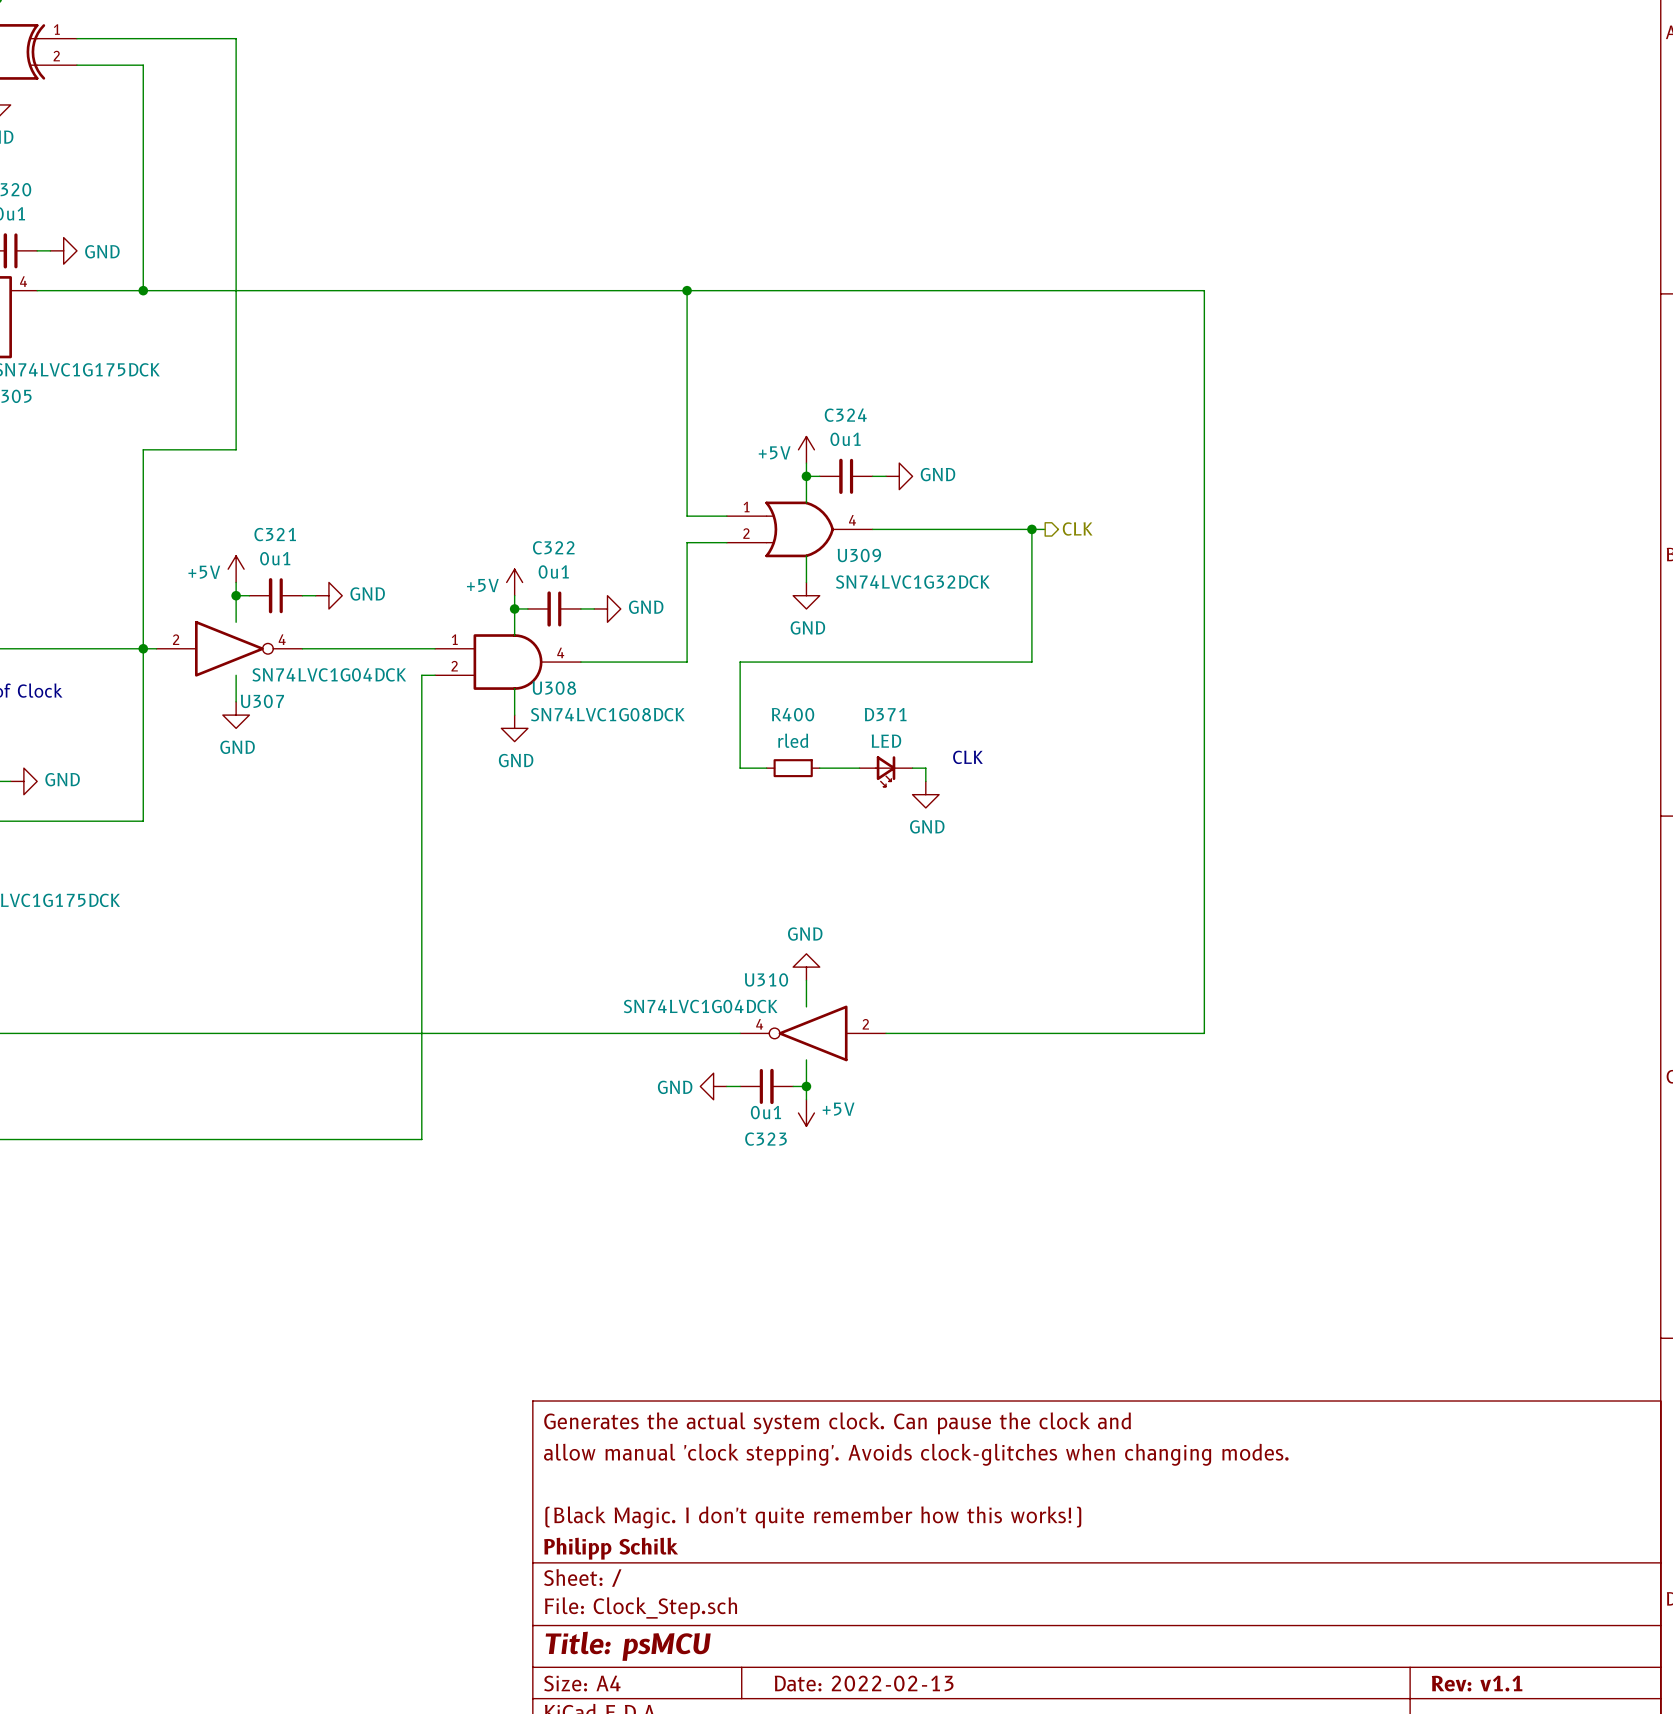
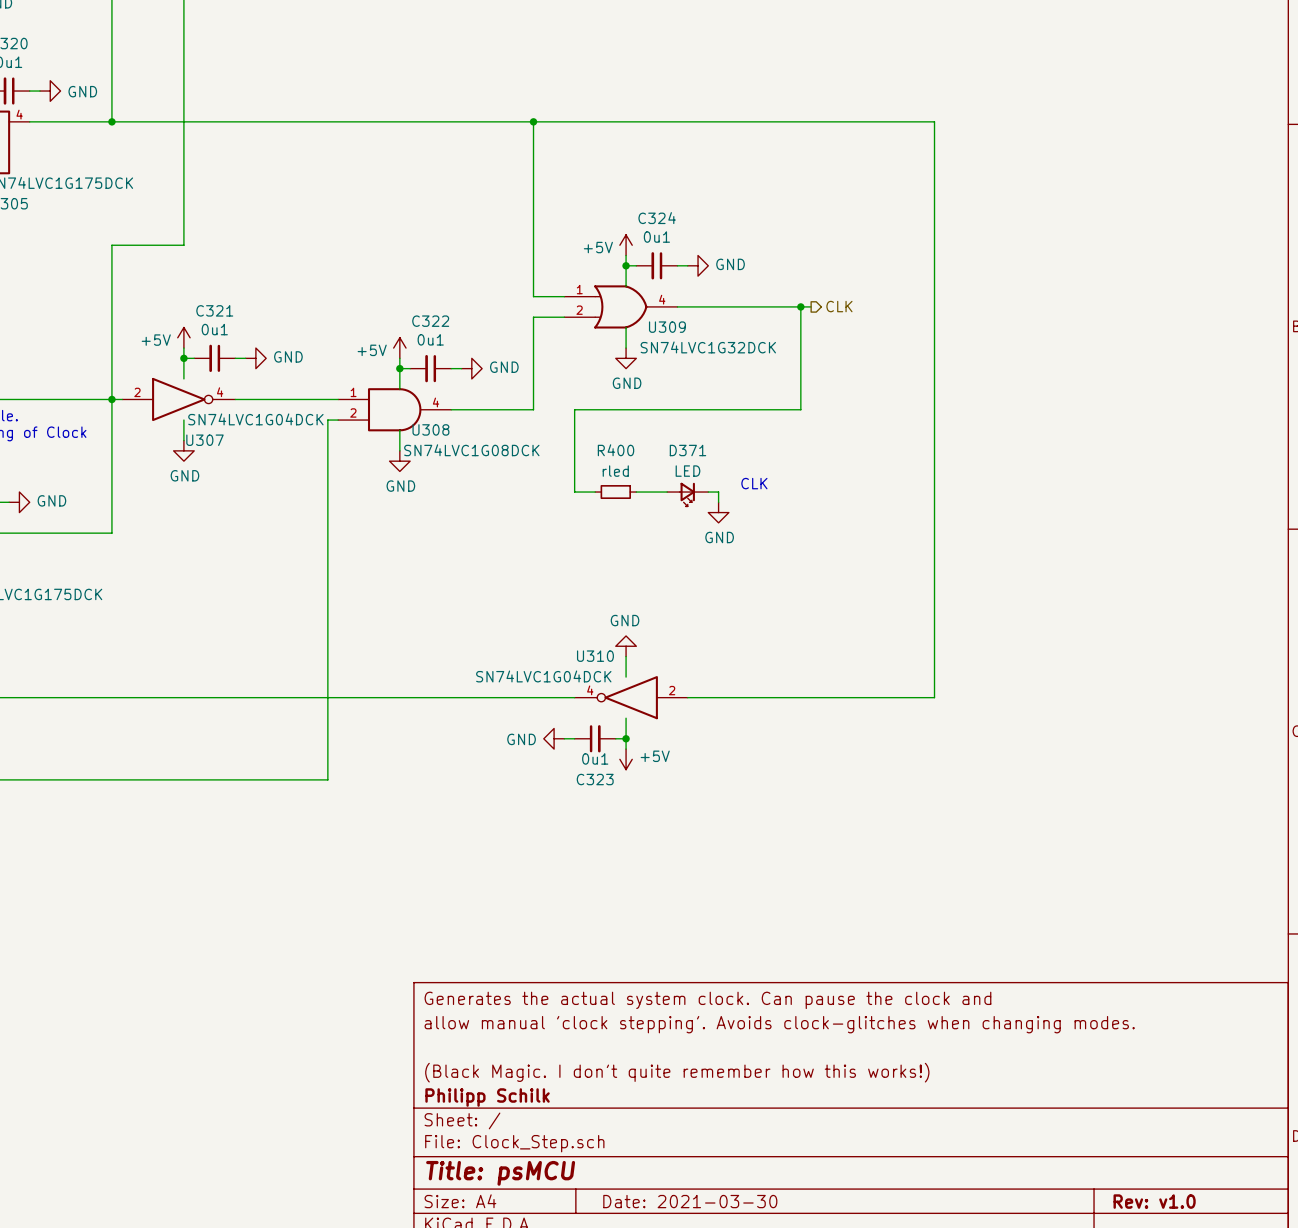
title block: Date: 2022-02-13 (864, 1683) -> Date: 2021-03-30 (690, 1201)
title block: Rev: v1.1 (1477, 1683) -> Rev: v1.0 (1154, 1201)

